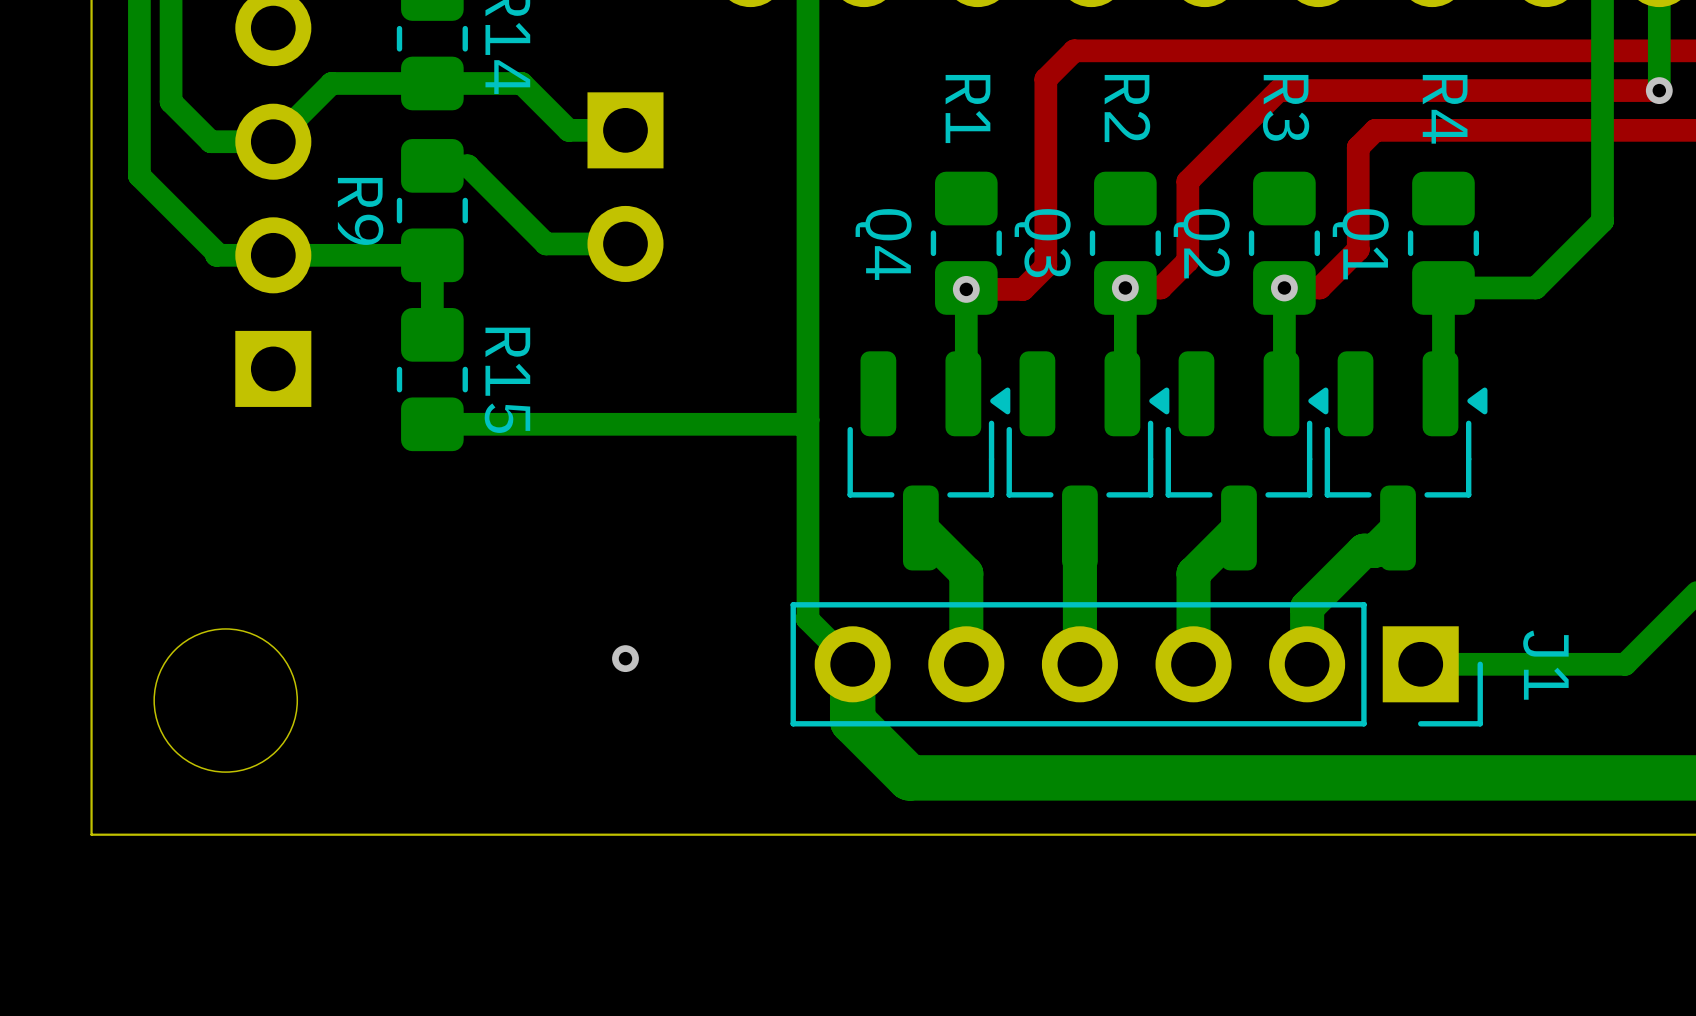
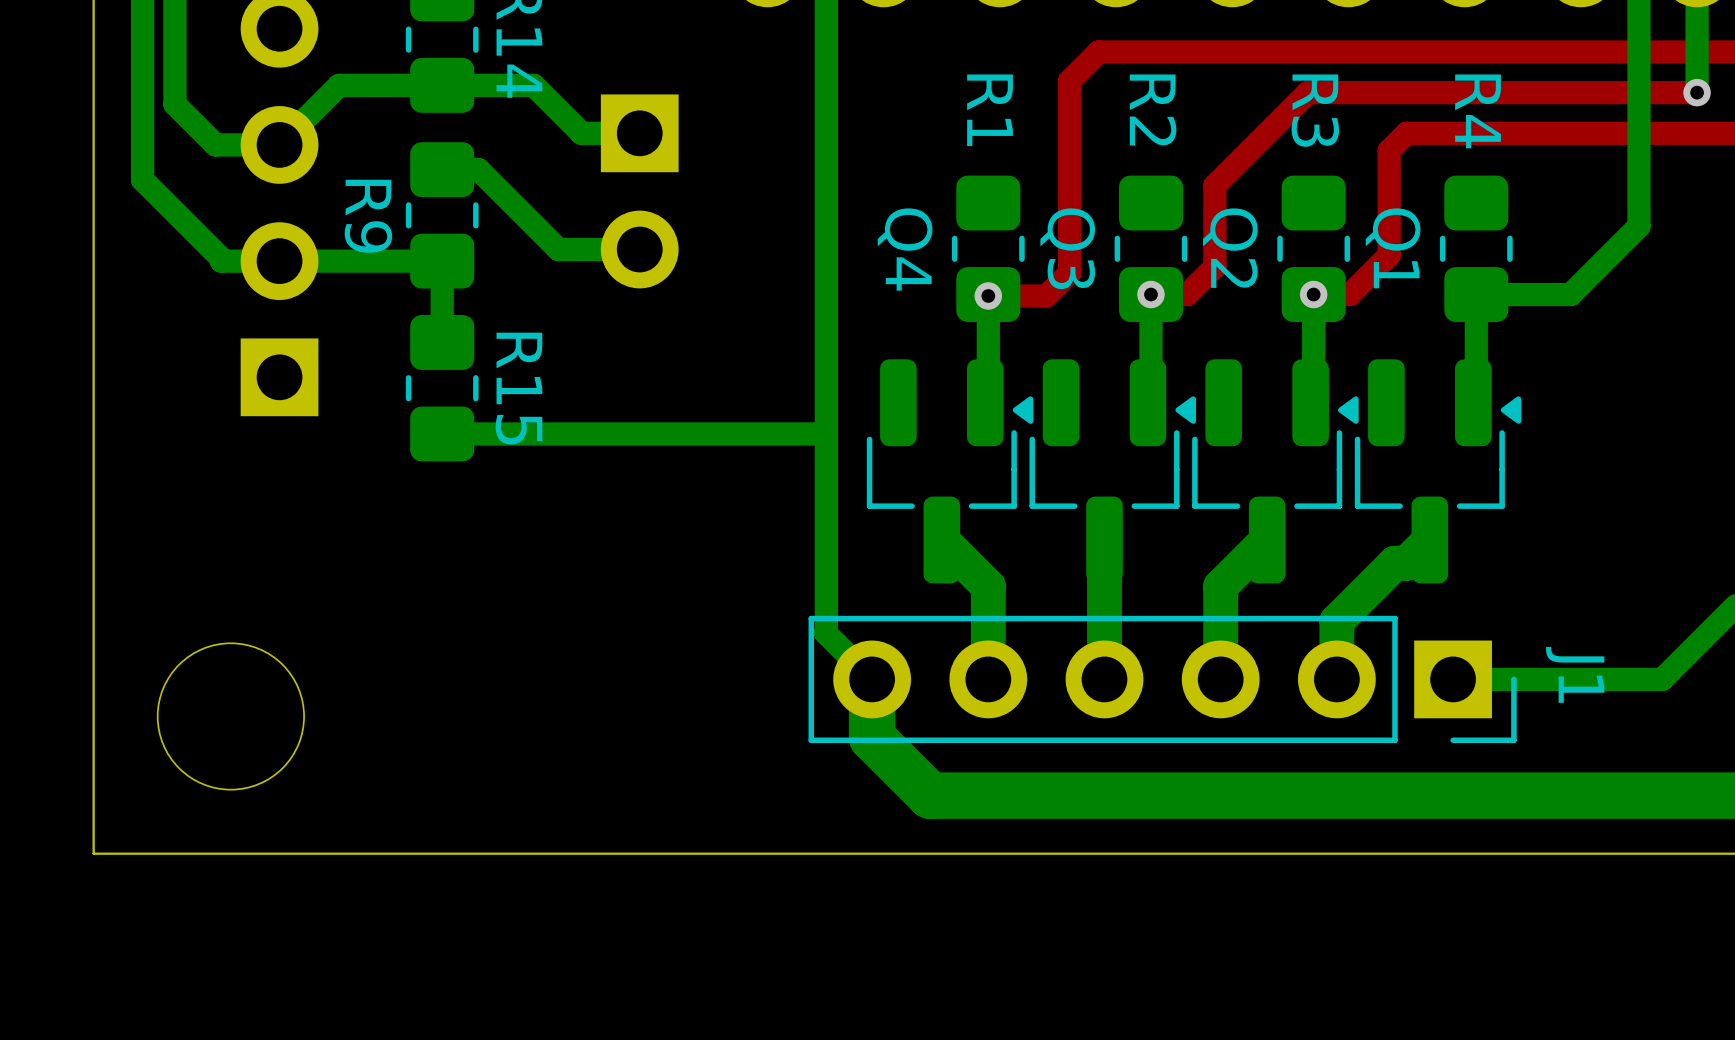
via: (625, 658) -> none

